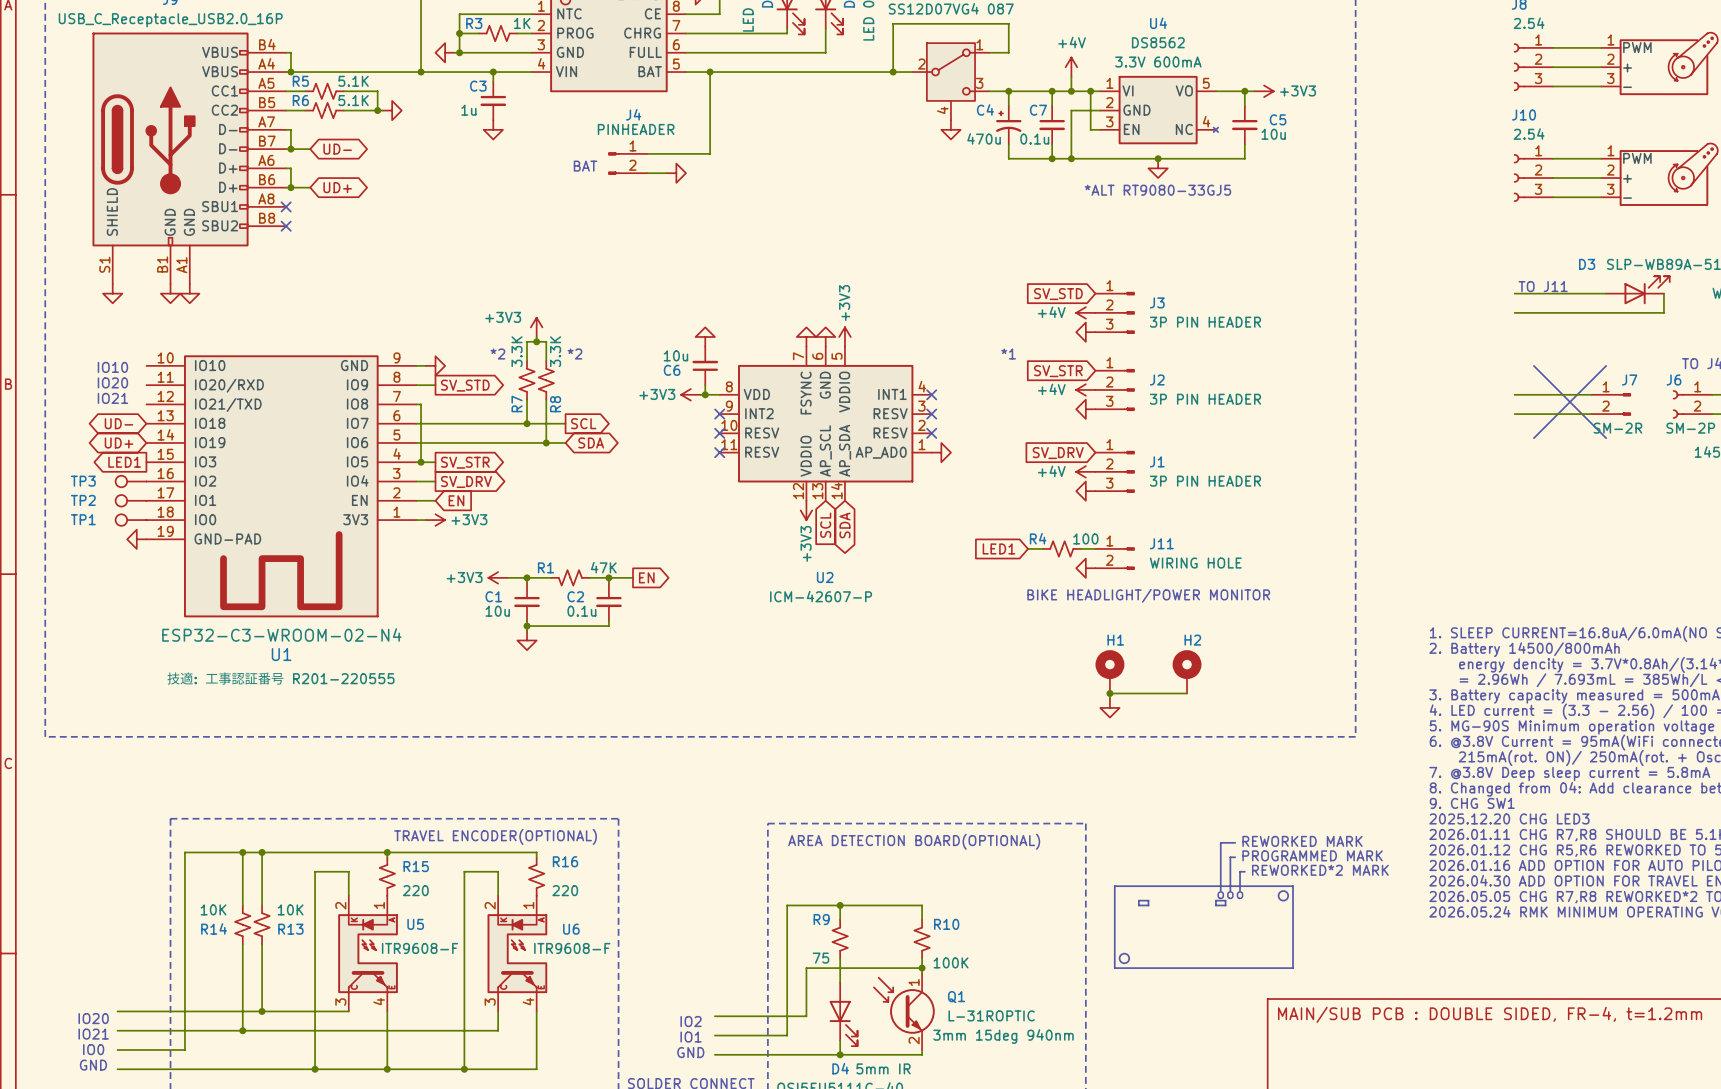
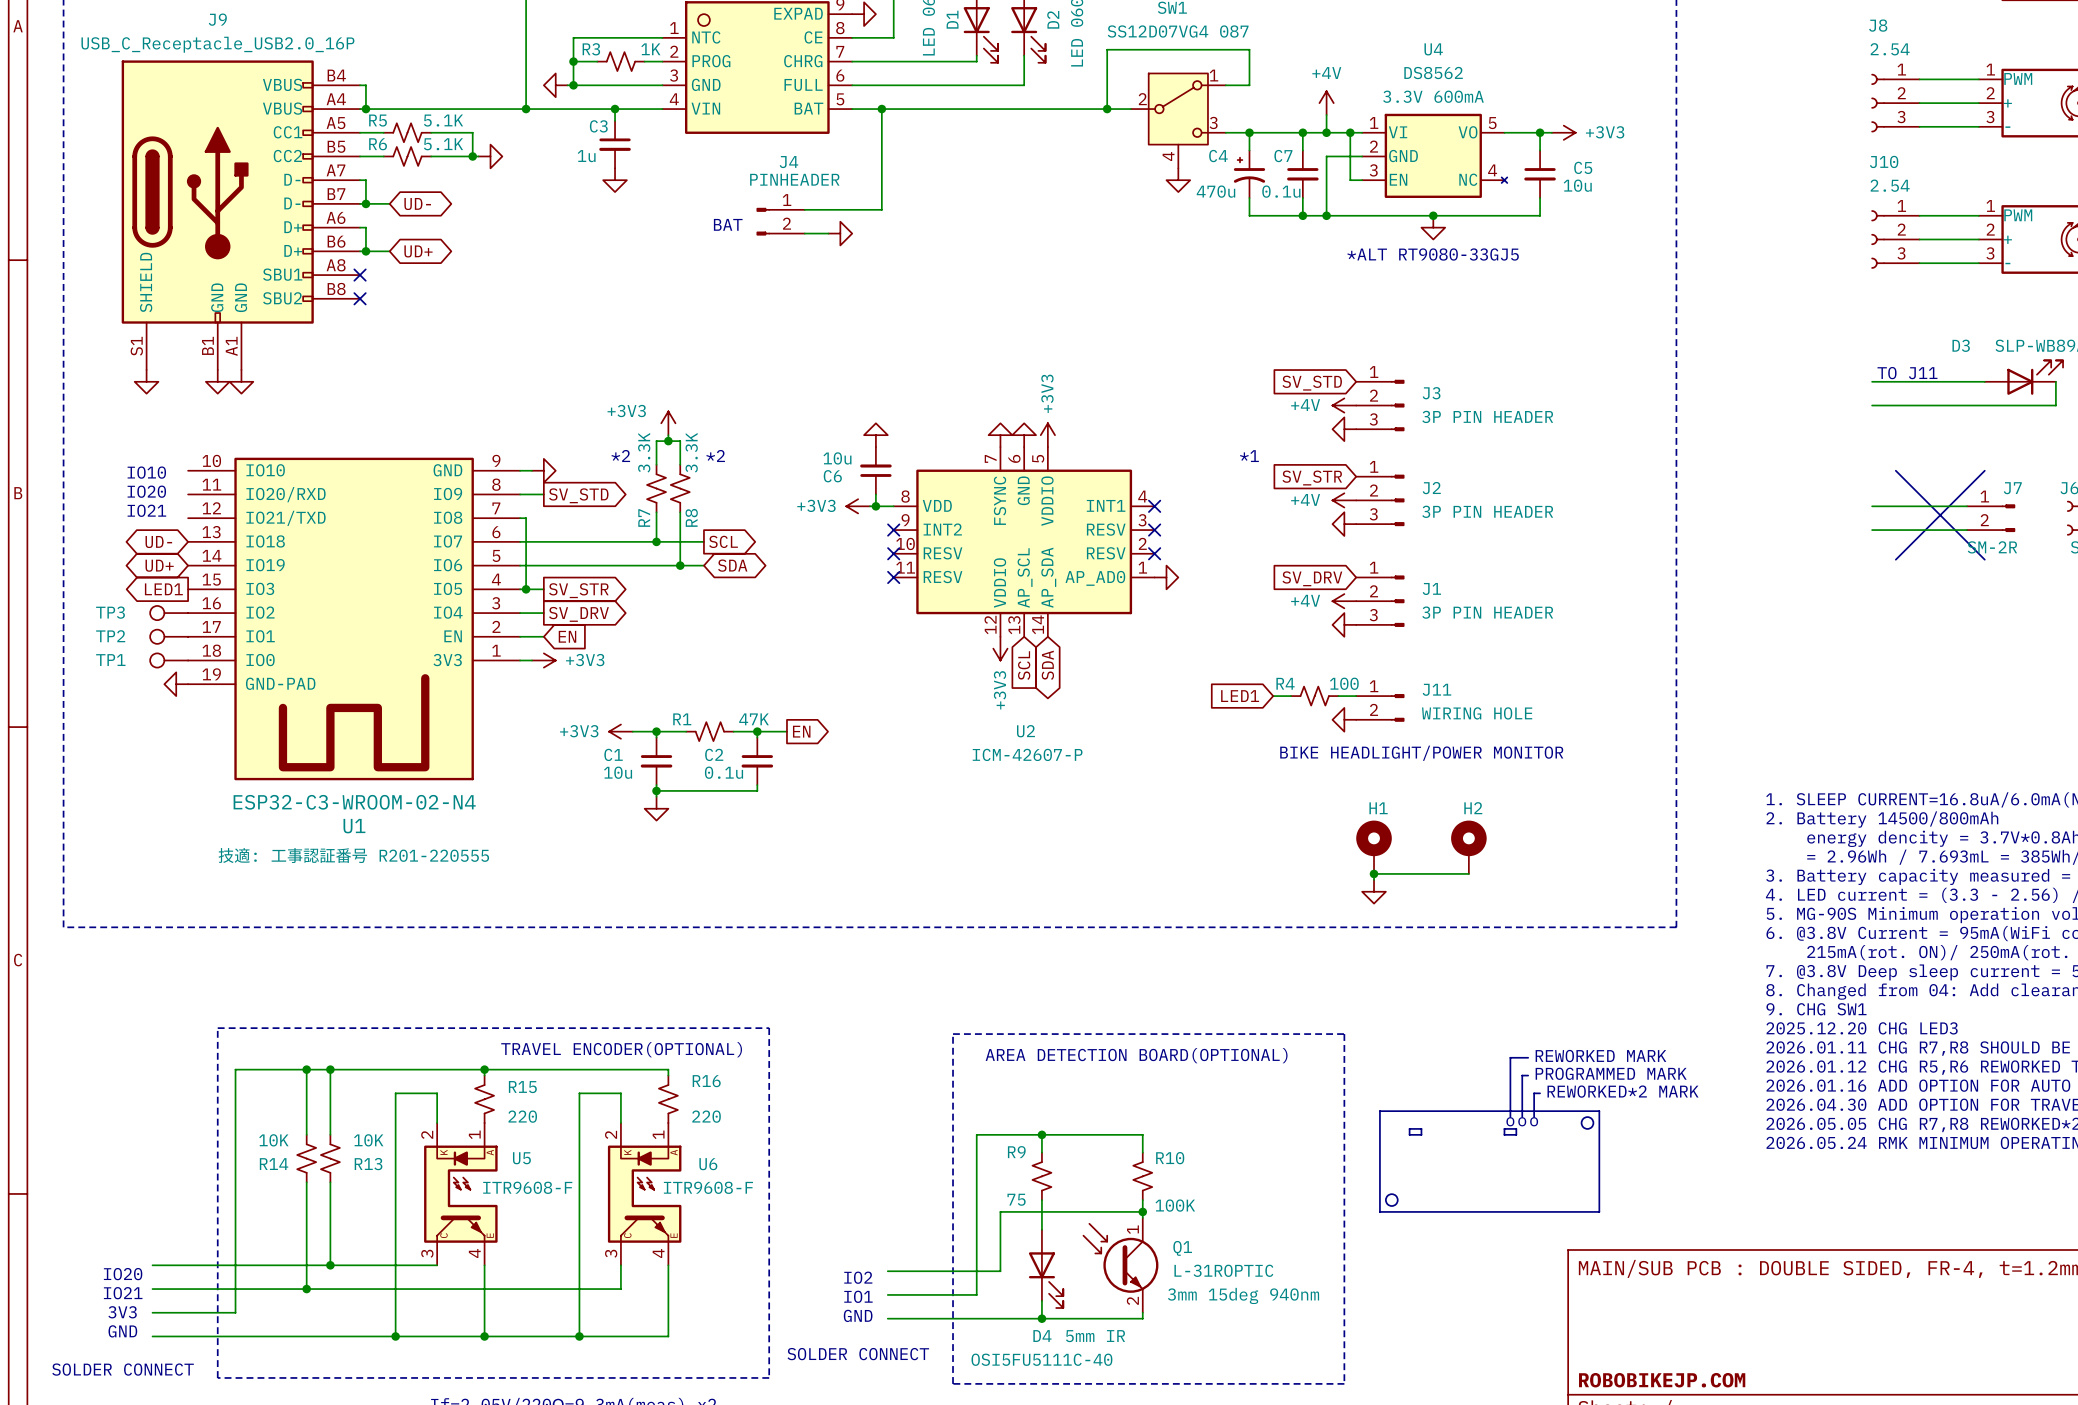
text: IO0 (93, 1049) -> 3V3 (122, 1312)

